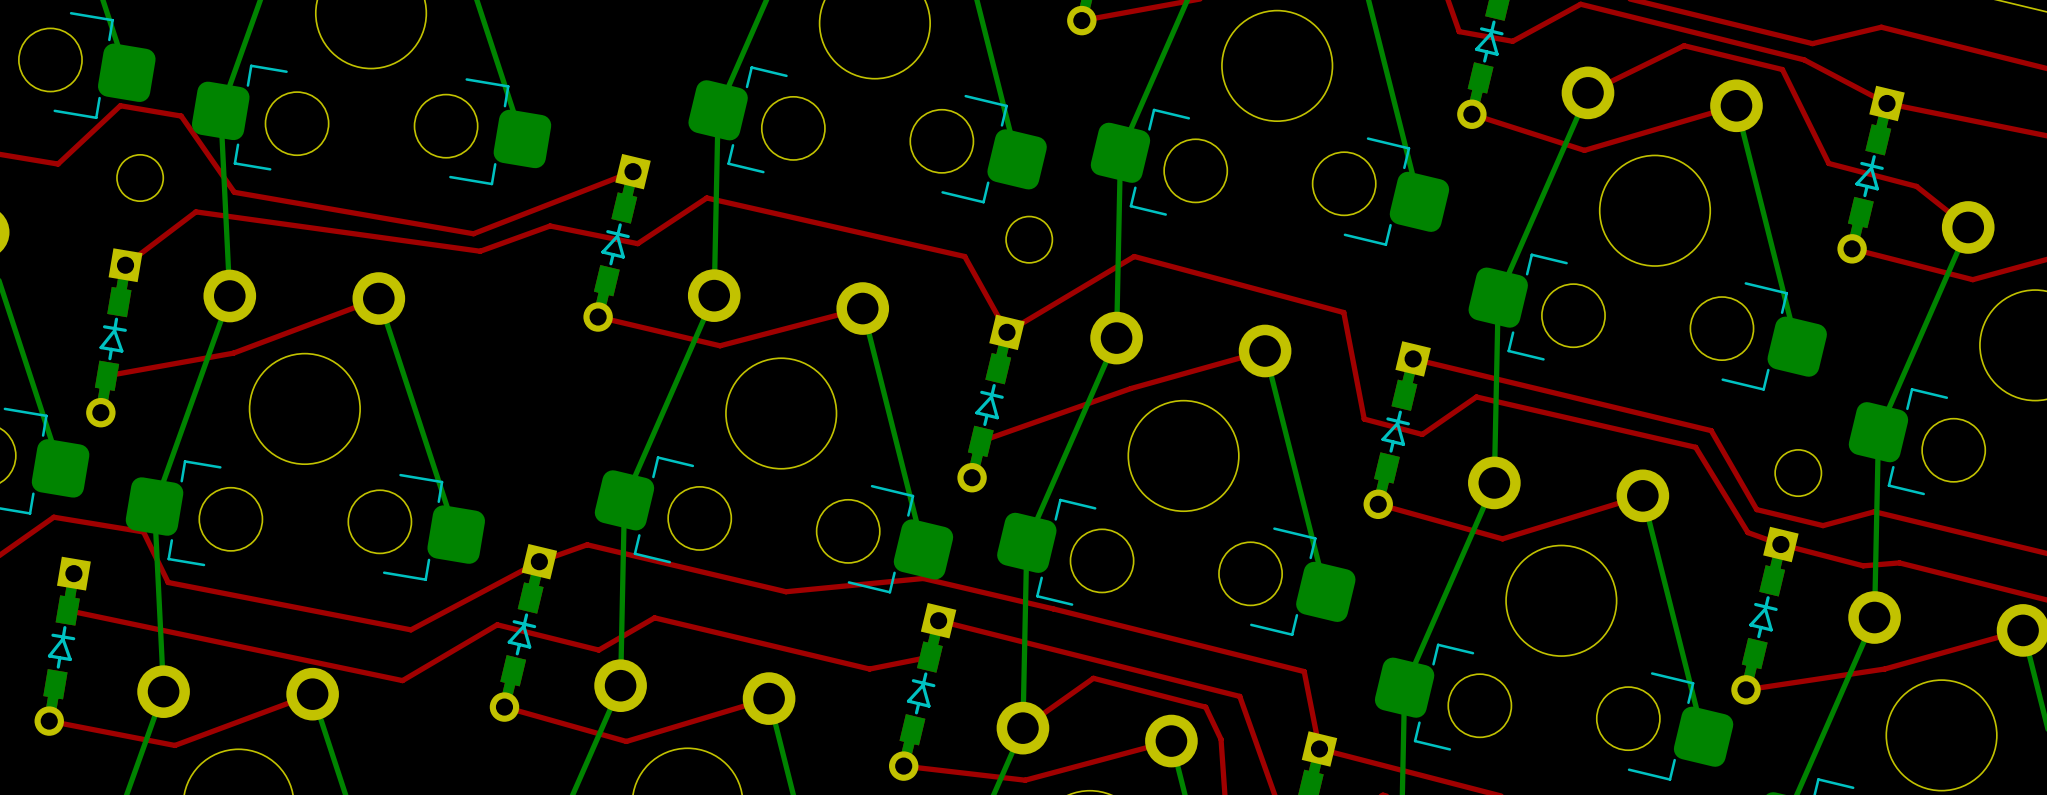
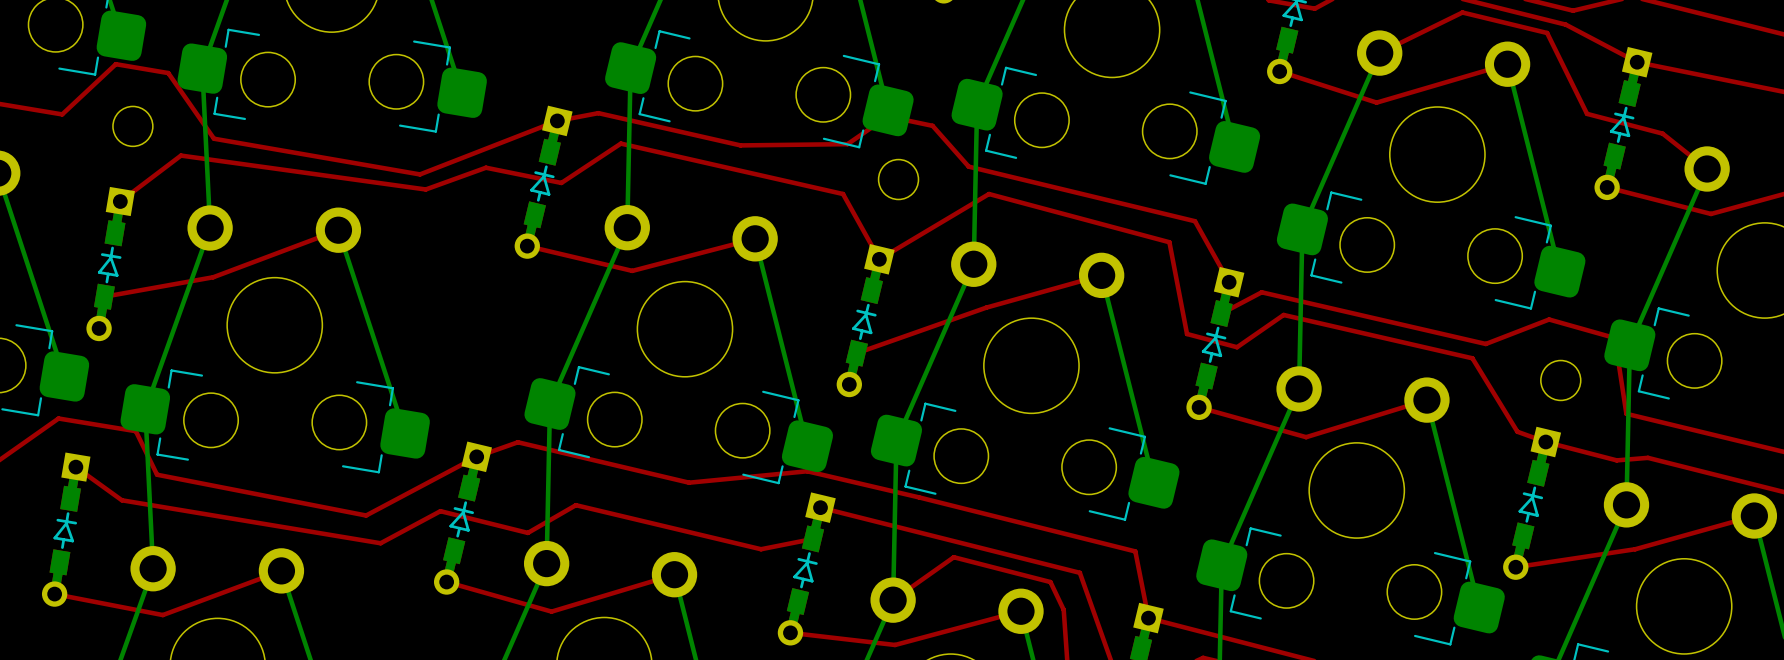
top track: none -> (557, 120) (598, 113) (740, 145) (847, 144) (887, 116) (932, 125) (968, 166) (1194, 221) (1229, 282)
top track: (1413, 358) (1711, 430) (1756, 509) (1823, 525) (1874, 511) -> (1221, 313) (1261, 292) (1485, 343) (1549, 319) (1614, 337) (1626, 413)
top track: (67, 610) (402, 680) (497, 624) -> (75, 467) (121, 500) (380, 543) (440, 511)

